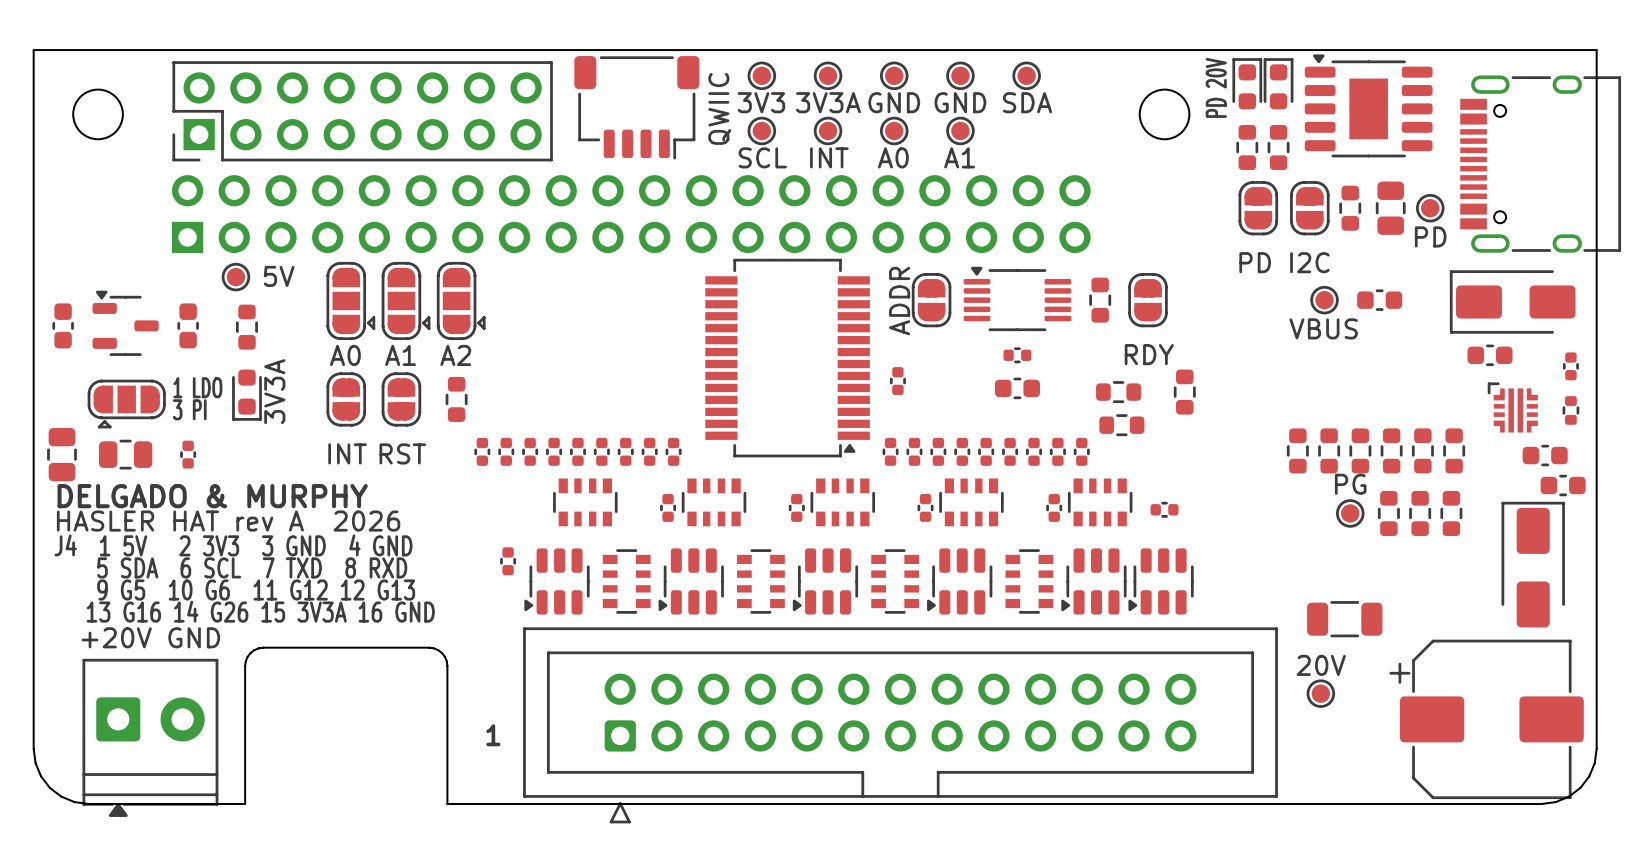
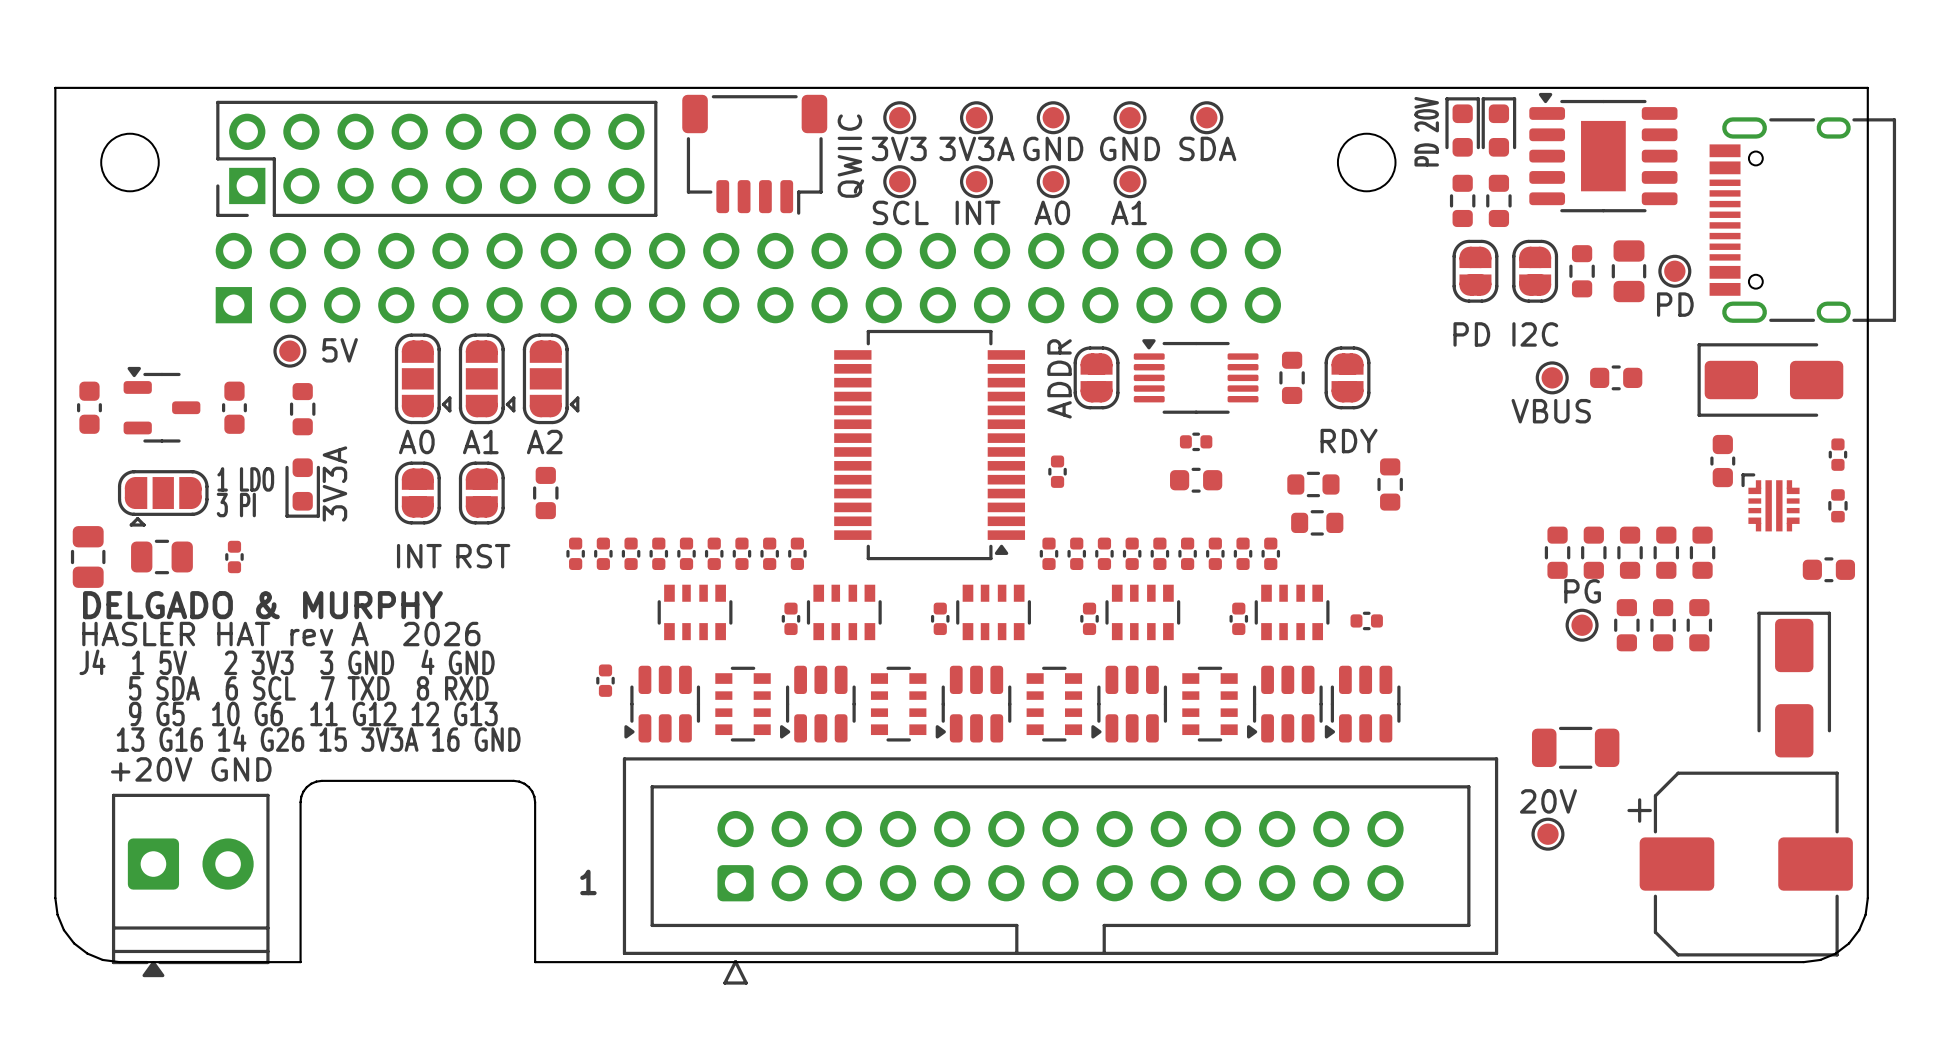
part rotation: 0° (1490, 355) -> 90° clockwise (1722, 461)
part: (1297, 450) -> none
part: (1545, 455) -> none
part: none -> (1828, 569)
part: (1563, 485) -> none

